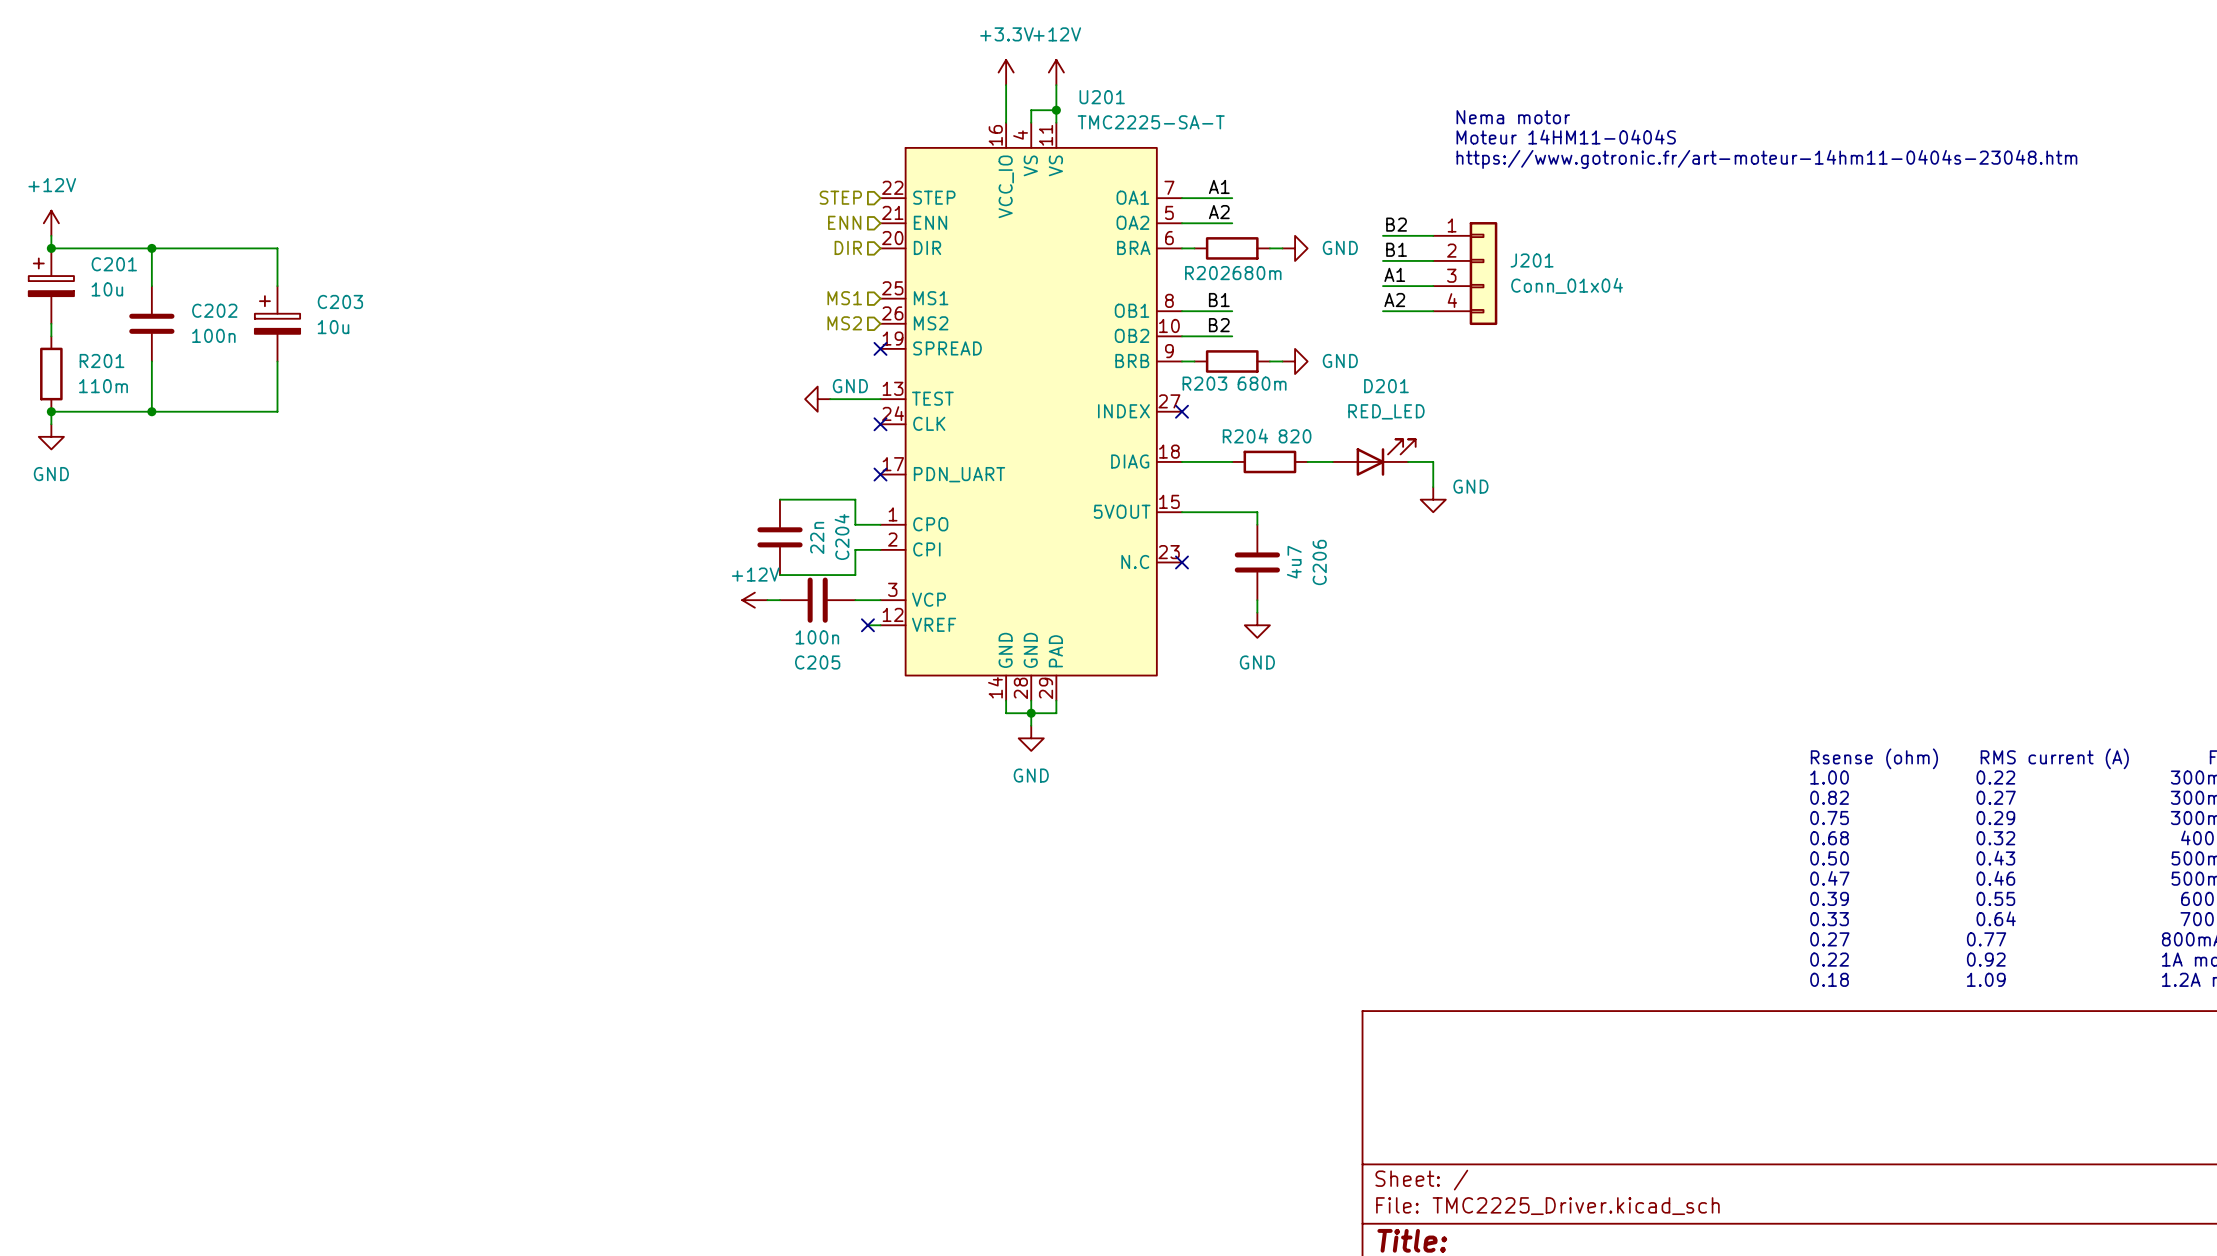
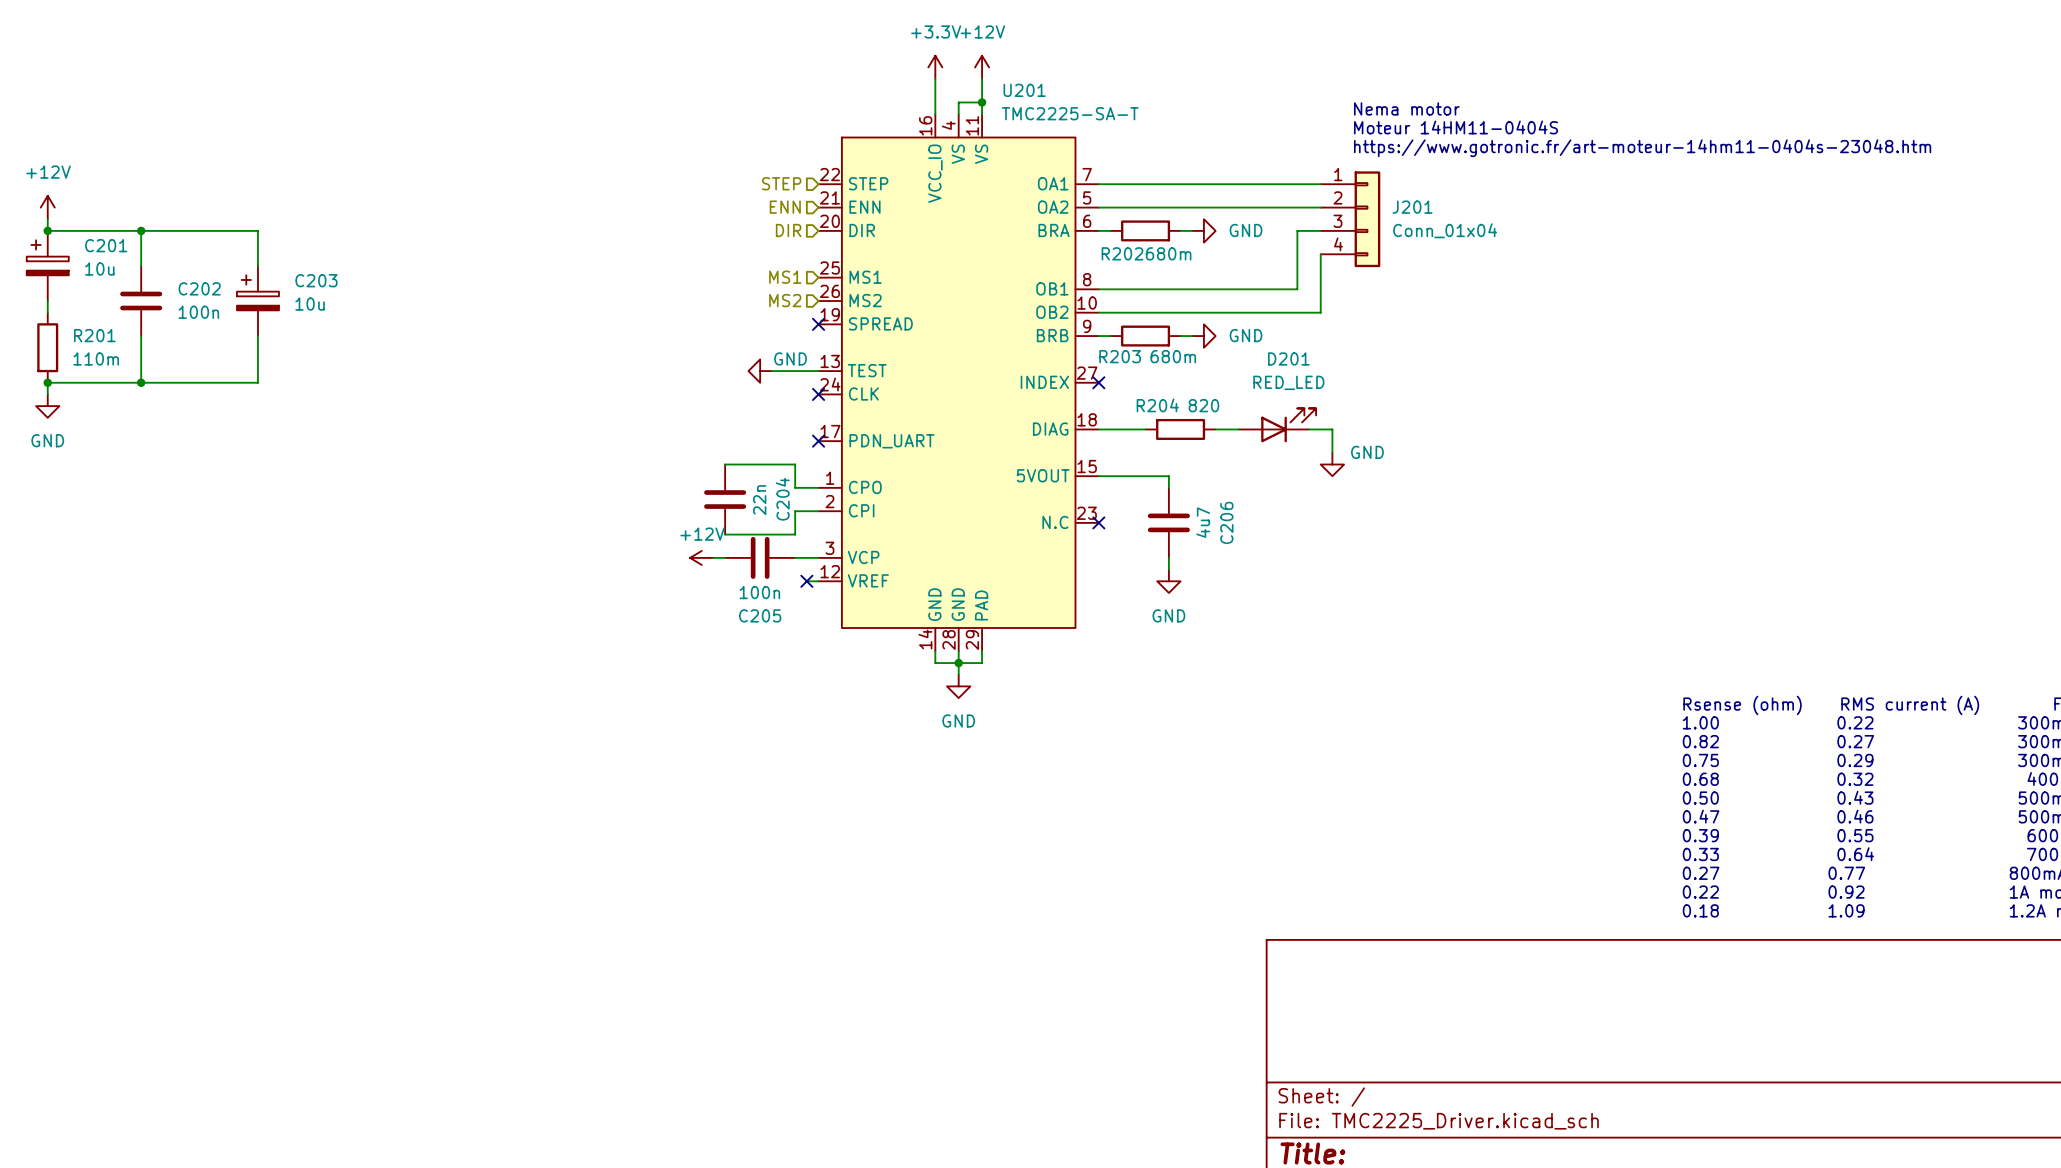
label: A1 (1219, 186) -> none
wire: none -> (1145, 184) (1320, 184)
label: A2 (1219, 212) -> none
wire: none -> (1145, 207) (1320, 207)
label: B2 (1396, 224) -> none
wire: (1383, 235) (1433, 235) -> none
label: B1 (1396, 249) -> none
wire: (1383, 260) (1433, 260) -> none
wire: none -> (1320, 254) (1320, 312) (1145, 312)
J201 position: (1465, 273) -> (1350, 219)
label: A1 (1394, 274) -> none
wire: (1383, 286) (1433, 286) -> none
label: B1 (1219, 300) -> none
label: A2 (1394, 300) -> none
wire: none -> (1145, 289) (1285, 289)
wire: (1395, 311) (1433, 311) -> (1297, 289) (1297, 230) (1320, 230)
label: B2 (1219, 325) -> none

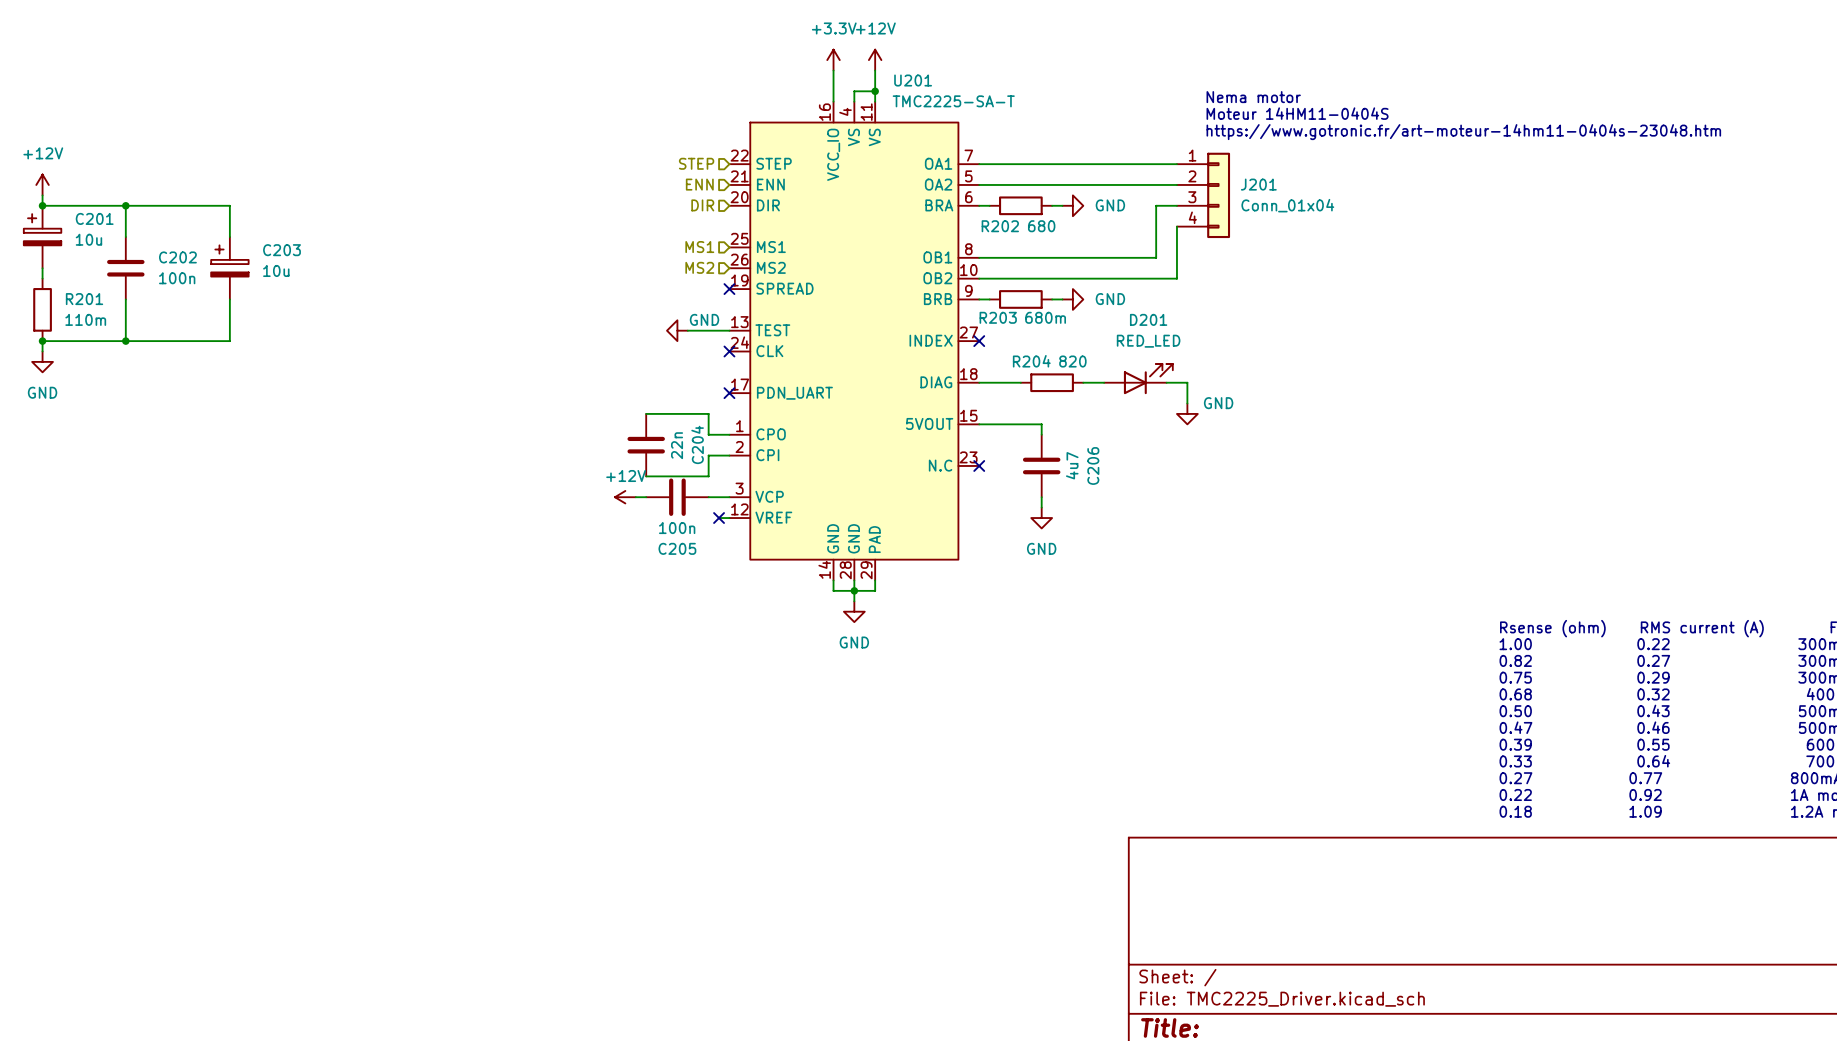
R202 value: 680m (1168, 253) -> 680 (1041, 226)

